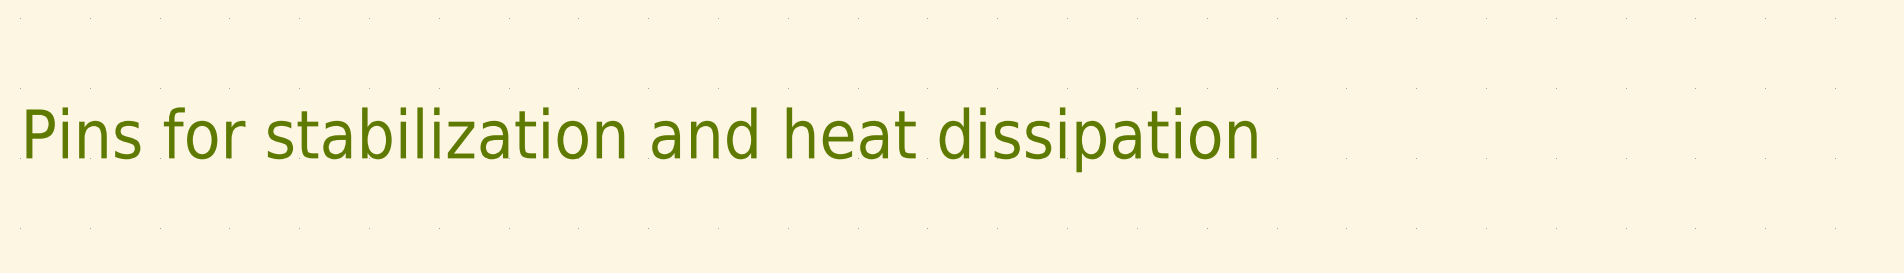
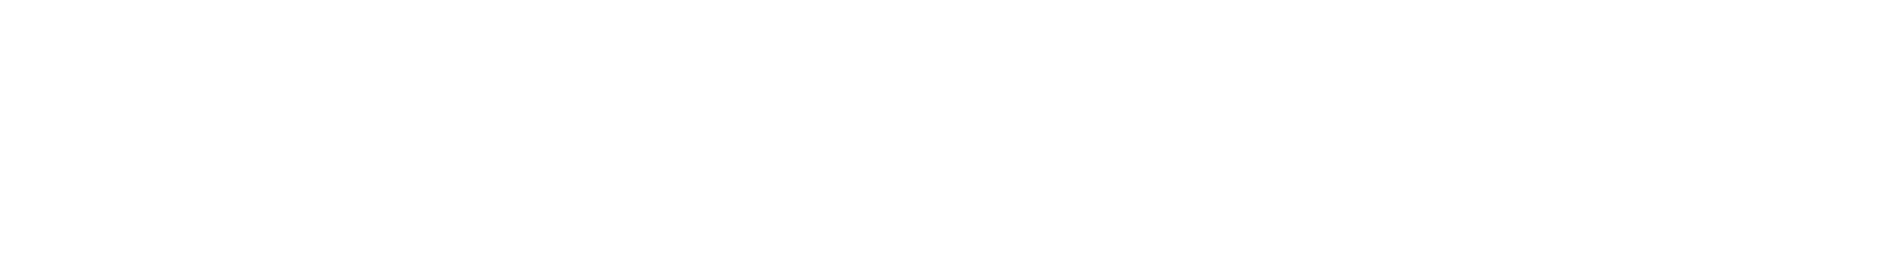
text: Pins for stabilization and heat dissipation (641, 139) -> none

